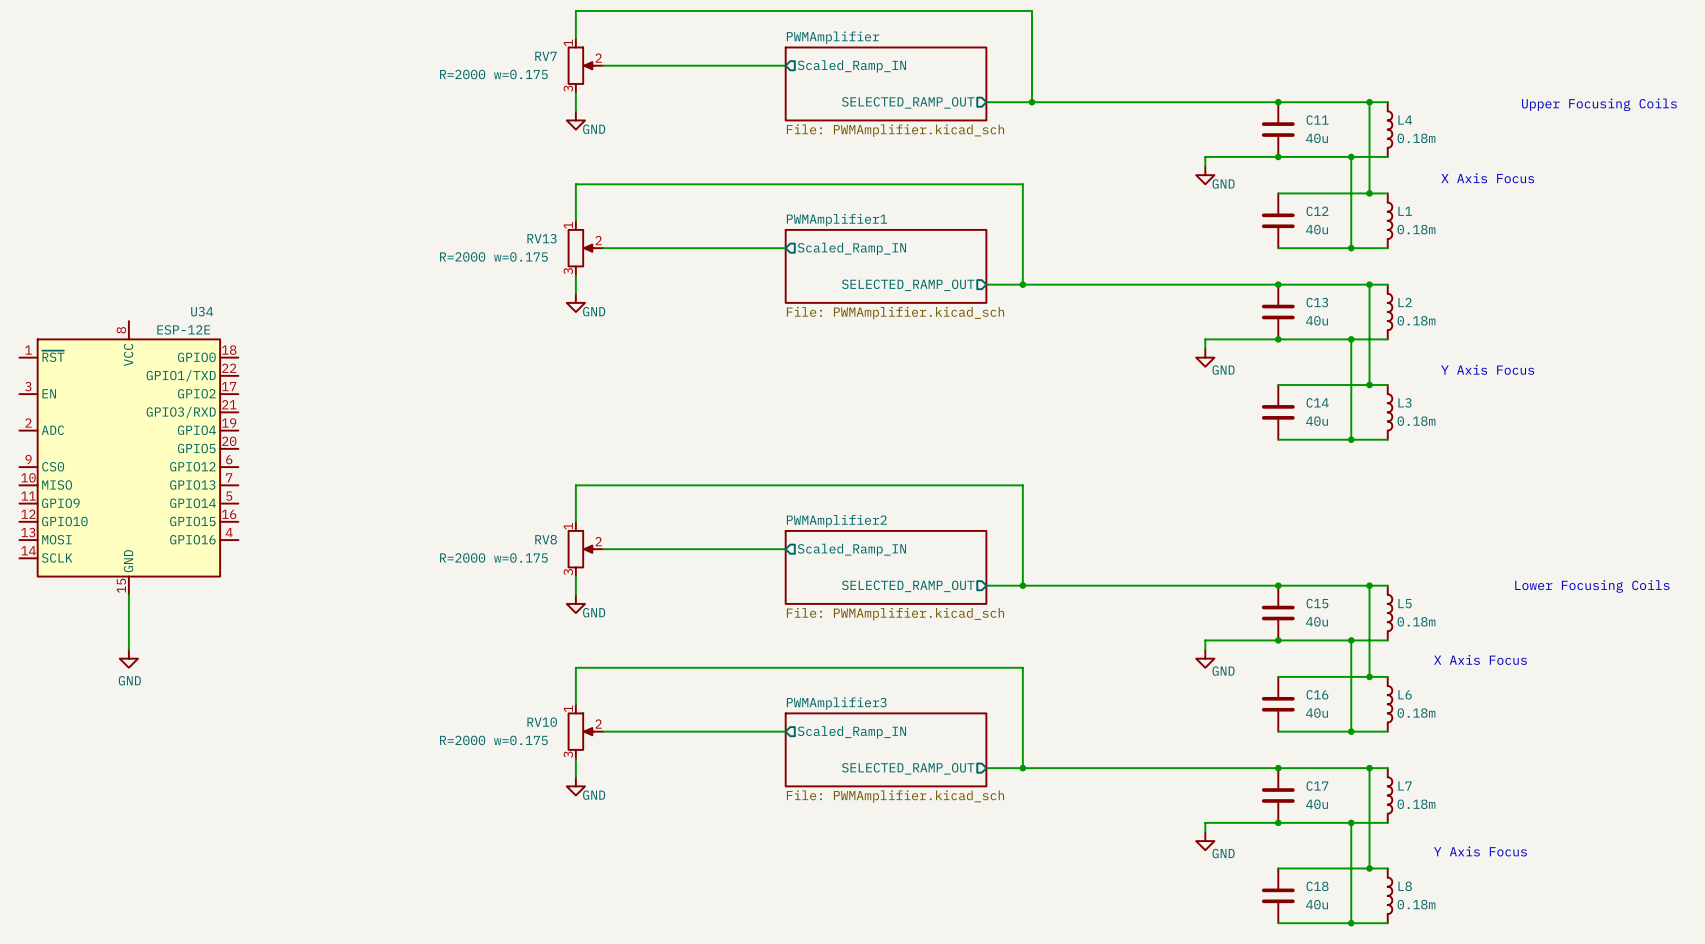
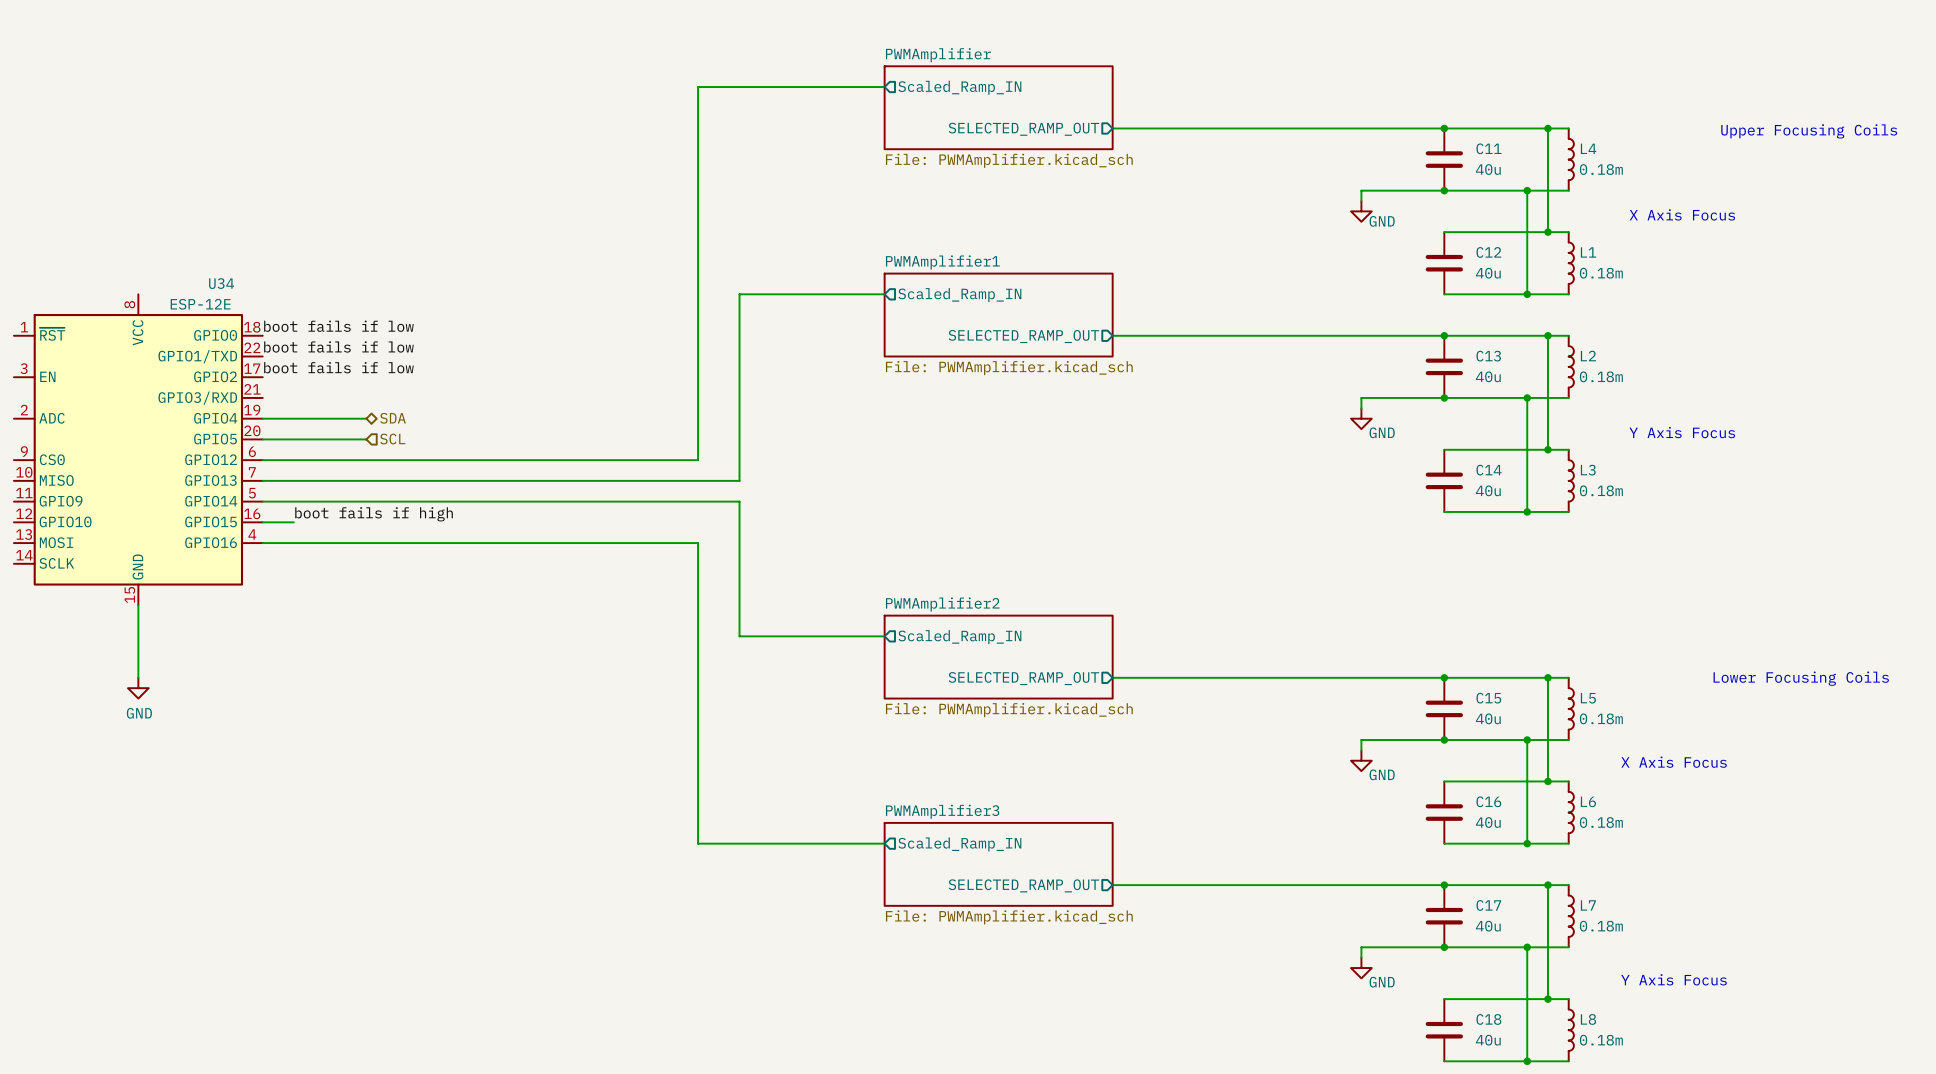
wire: (575, 38) (575, 10) (1031, 10) (1031, 102) -> none
RV7: (585, 65) -> none
wire: (603, 65) (621, 65) -> (262, 460) (698, 460) (698, 87)
wire: (575, 93) (575, 111) -> none
junction: (1031, 102) -> none
power symbol: GND (575, 120) -> none
wire: (575, 220) (575, 184) (1022, 184) (1022, 284) -> none
RV13: (585, 248) -> none
wire: (603, 248) (657, 248) -> (262, 480) (739, 480) (739, 294)
wire: (575, 275) (575, 293) -> none
label: none -> boot fails if low (338, 326)
junction: (1022, 284) -> none
label: none -> boot fails if low (338, 346)
power symbol: GND (575, 302) -> none
label: none -> boot fails if low (338, 367)
wire: none -> (262, 418) (366, 418)
hierarchical label: none -> SDA (393, 418)
wire: none -> (262, 439) (366, 439)
hierarchical label: none -> SCL (392, 439)
label: none -> boot fails if high (374, 514)
wire: none -> (262, 522) (293, 522)
U34 position: (128, 457) -> (138, 449)
wire: (575, 521) (575, 485) (1022, 485) (1022, 585) -> none
RV8: (585, 549) -> none
wire: (603, 549) (657, 549) -> (262, 501) (739, 501) (739, 636)
wire: (575, 576) (575, 594) -> none
junction: (1022, 585) -> none
wire: (128, 594) (128, 649) -> none
power symbol: GND (575, 603) -> none
power symbol position: GND (128, 658) -> GND (138, 688)
wire: (575, 704) (575, 667) (1022, 667) (1022, 768) -> none
RV10: (585, 731) -> none
wire: (603, 731) (621, 731) -> (262, 543) (698, 543) (698, 843)
wire: (575, 759) (575, 777) -> none
junction: (1022, 768) -> none
power symbol: GND (575, 786) -> none

